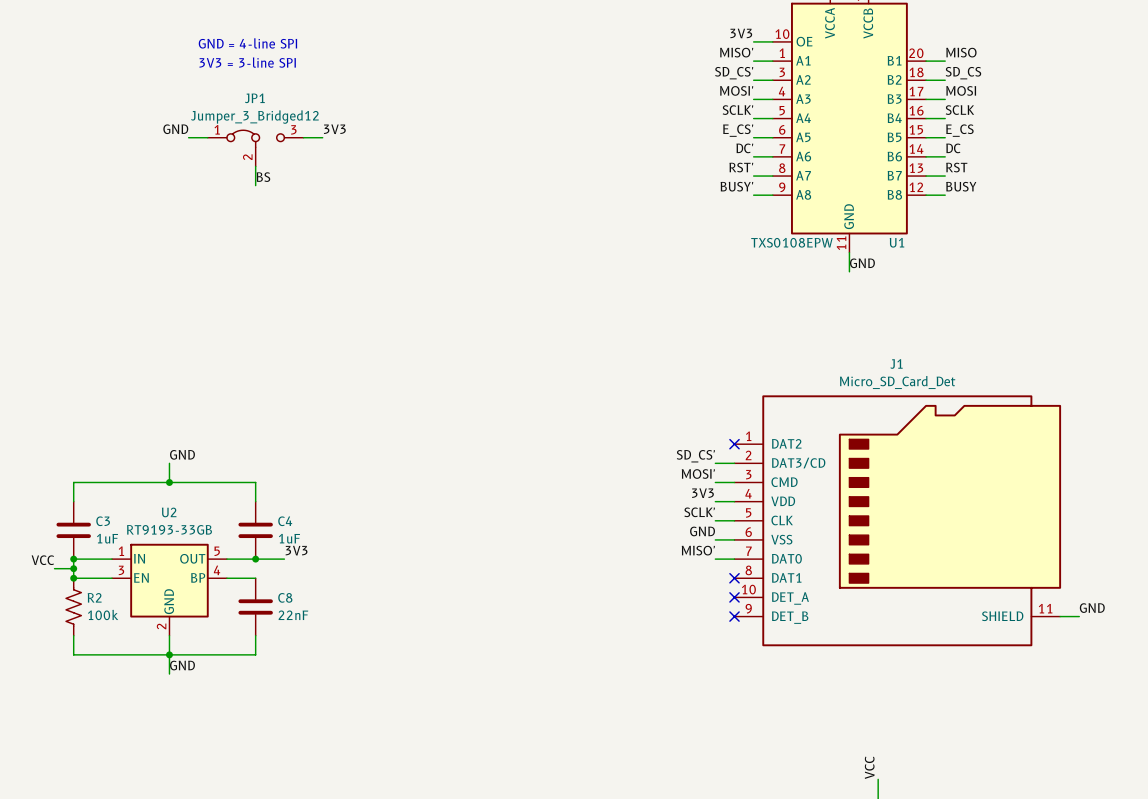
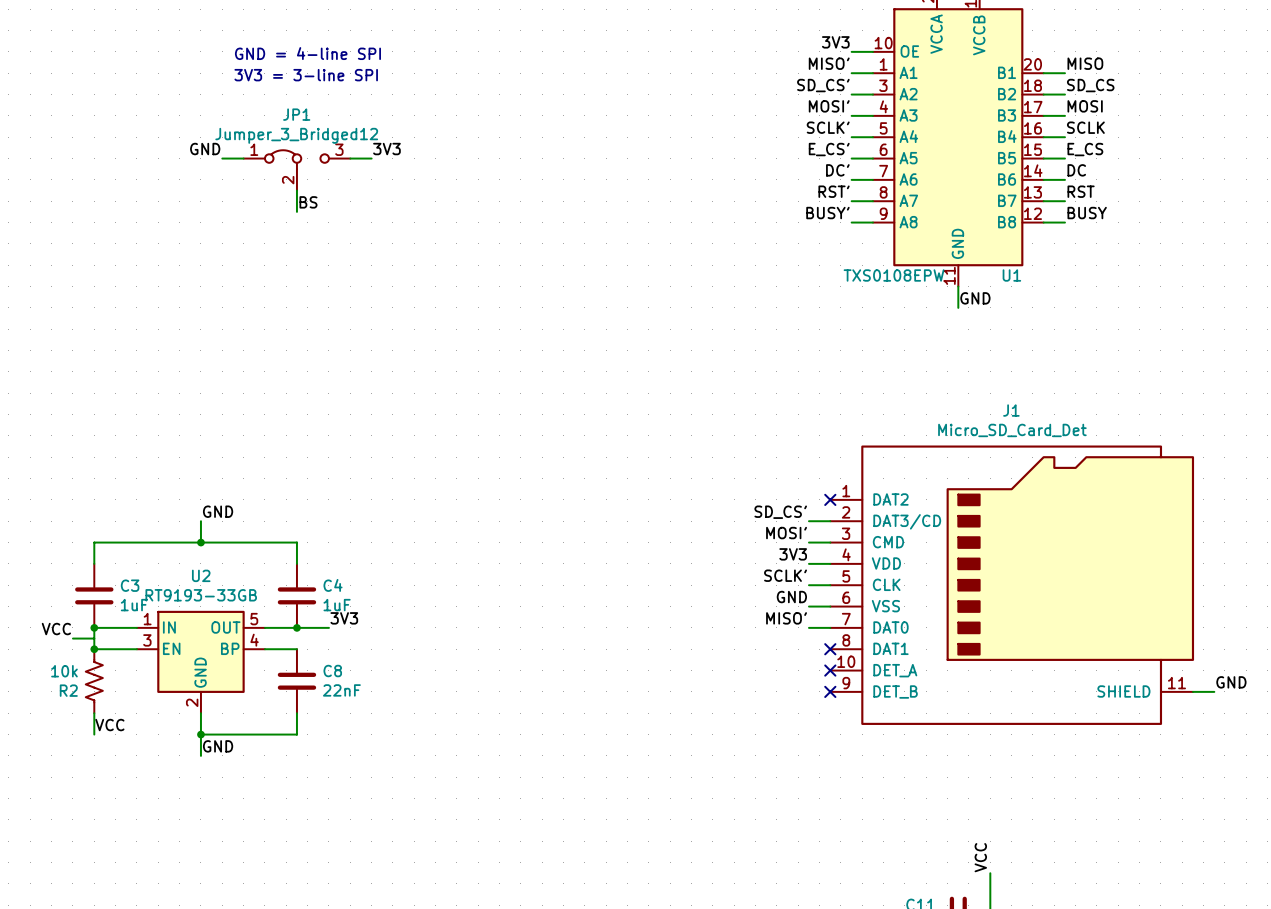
junction: (73, 568) -> none
R2 name position: R2 (94, 597) -> R2 (68, 690)
R2 value: 100k (103, 614) -> 10k (64, 671)
label: none -> VCC (109, 725)
wire: (73, 654) (169, 654) -> none

